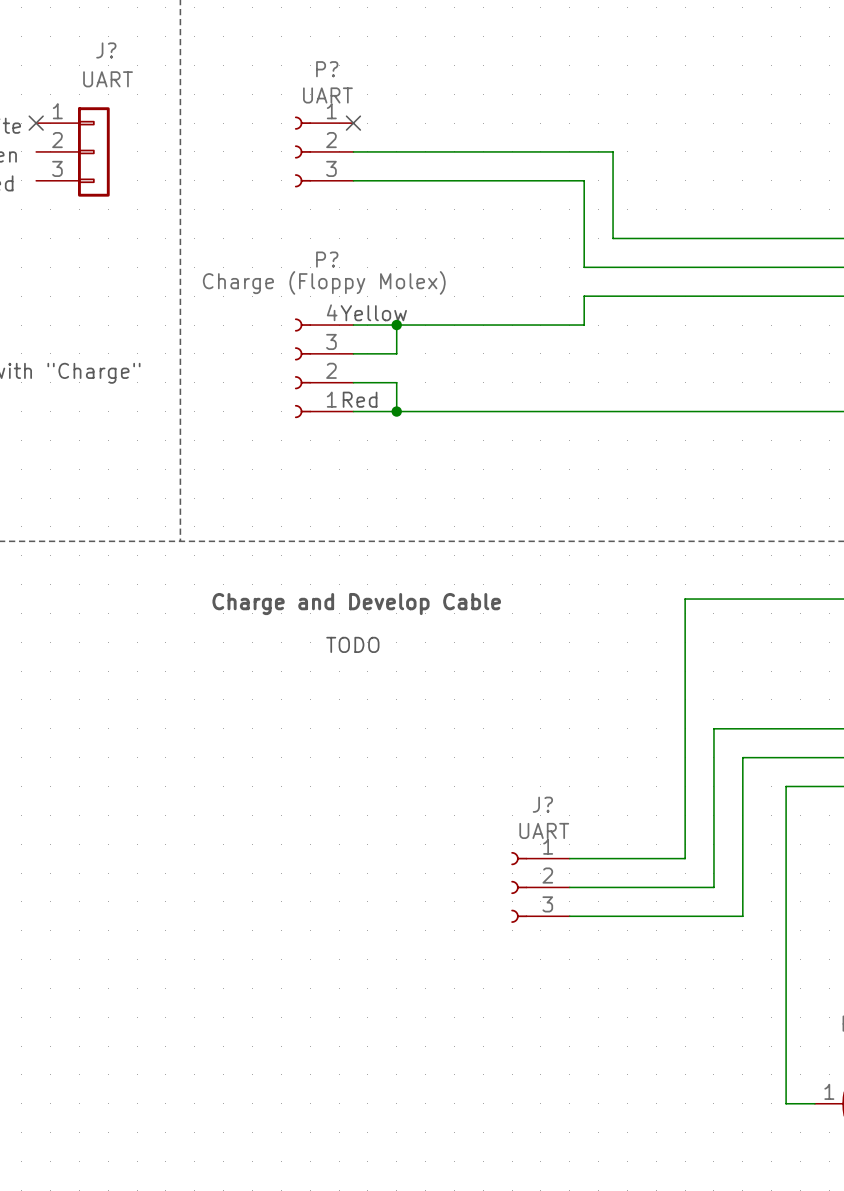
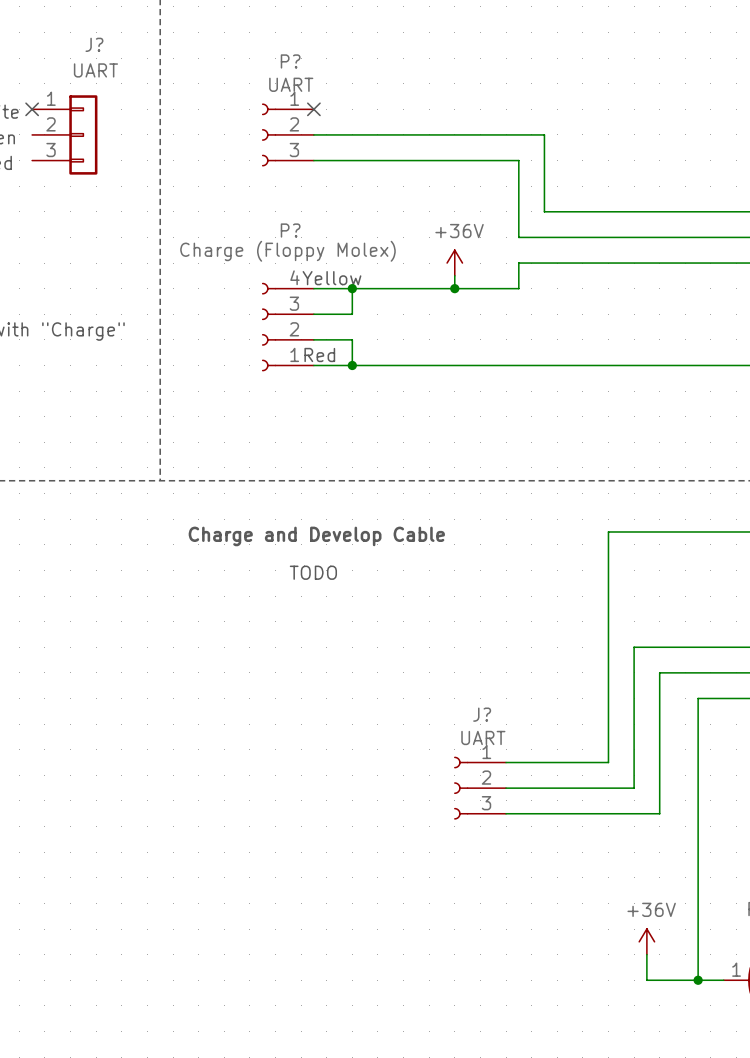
power symbol: none -> +36V (454, 263)
wire: none -> (454, 275) (454, 288)
junction: none -> (454, 288)
power symbol: none -> +36V (646, 941)
wire: none -> (646, 954) (646, 980) (698, 980)
junction: none -> (698, 980)

